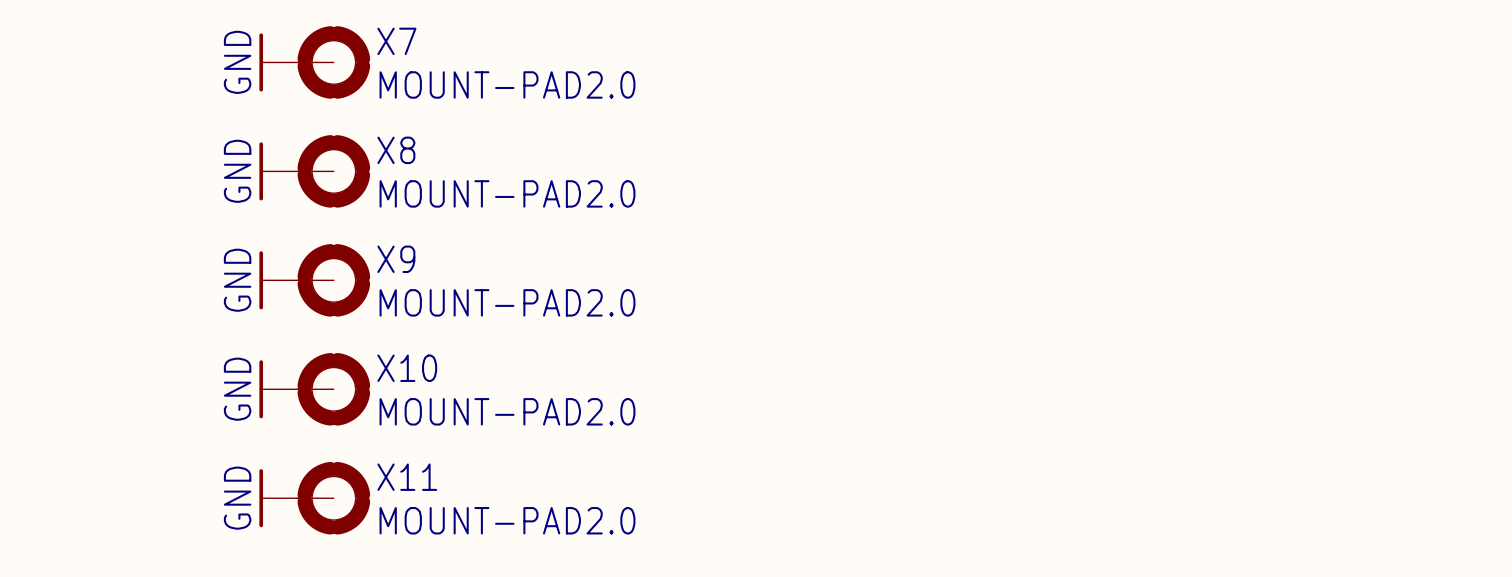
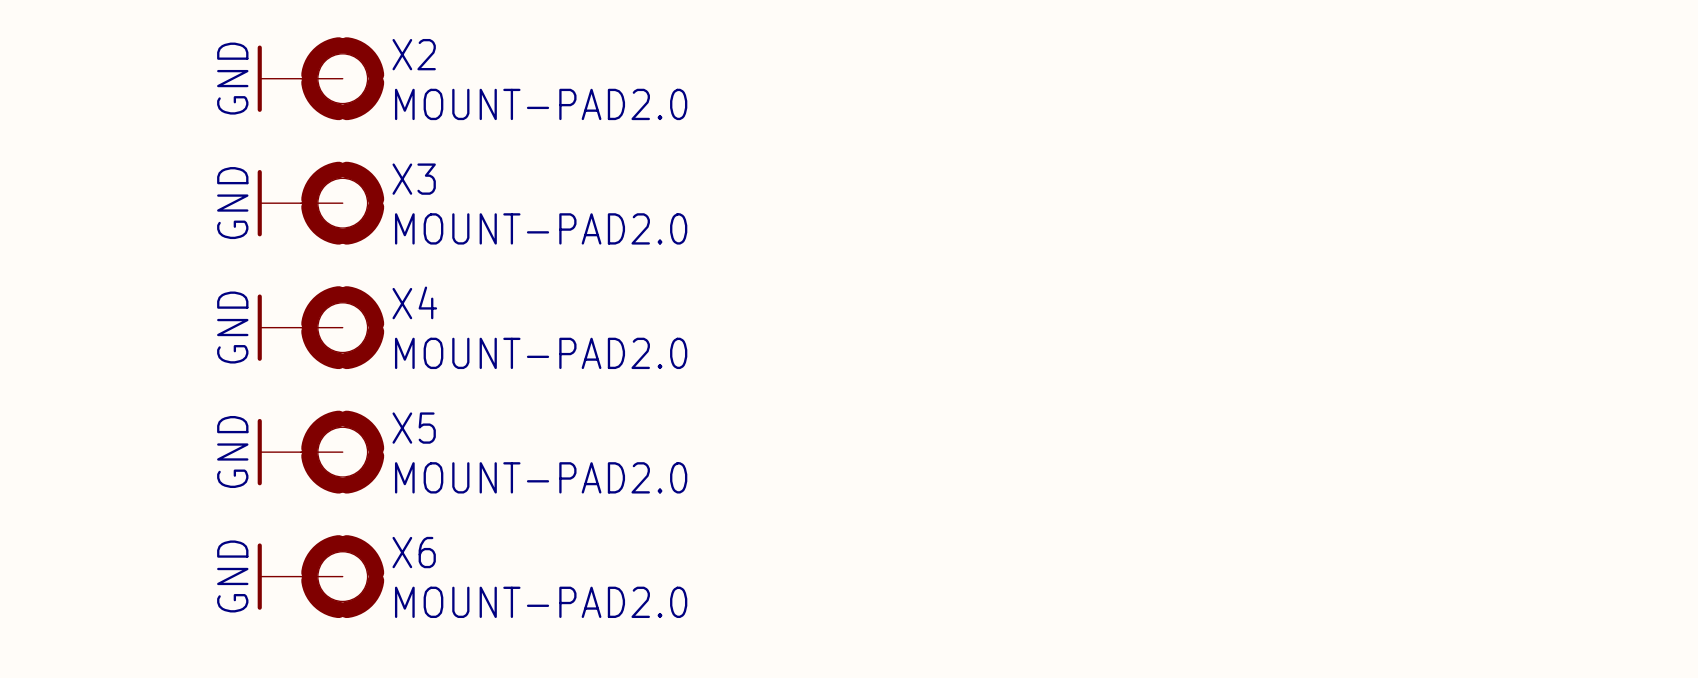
X7 name: X7 (396, 41) -> X2 (414, 54)
X8 name: X8 (396, 150) -> X3 (414, 179)
X9 name: X9 (396, 259) -> X4 (414, 302)
X10 name: X10 (407, 368) -> X5 (414, 428)
X11 name: X11 (407, 477) -> X6 (414, 552)

